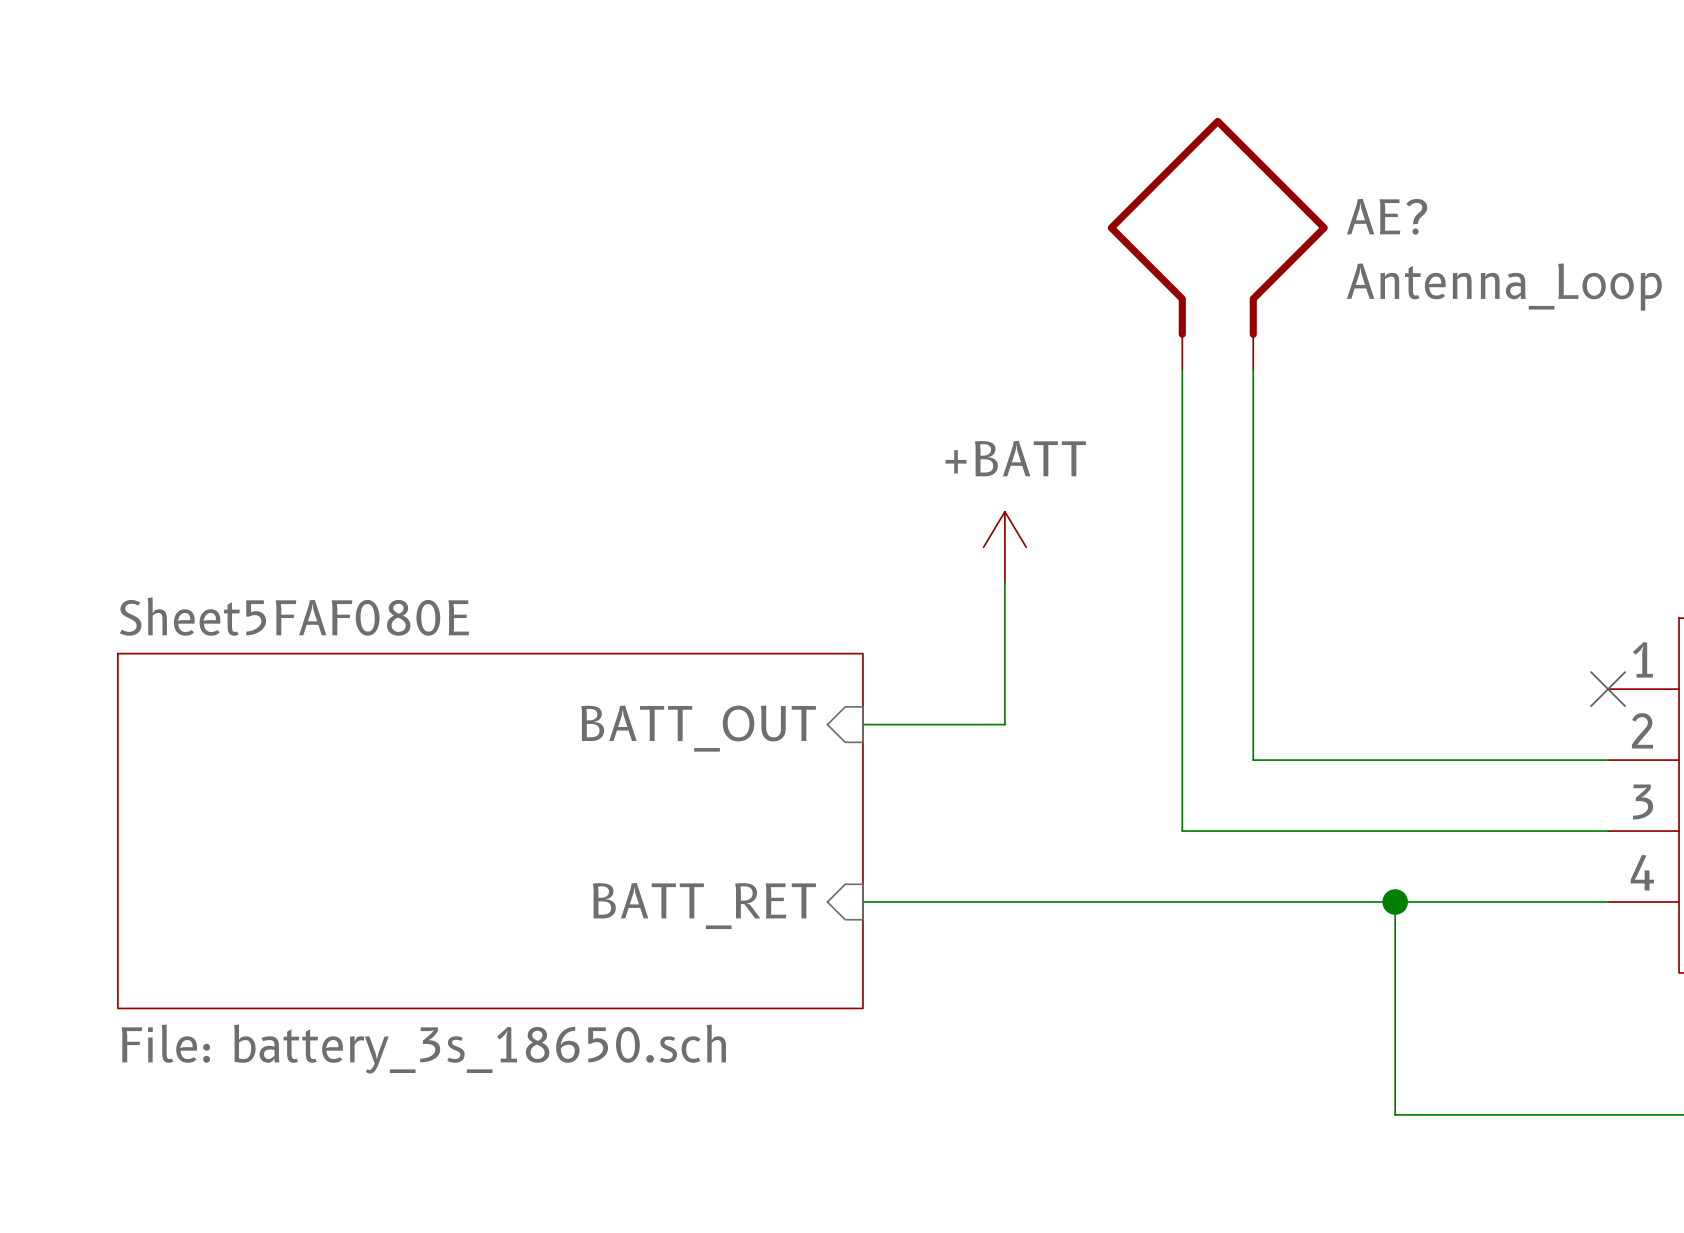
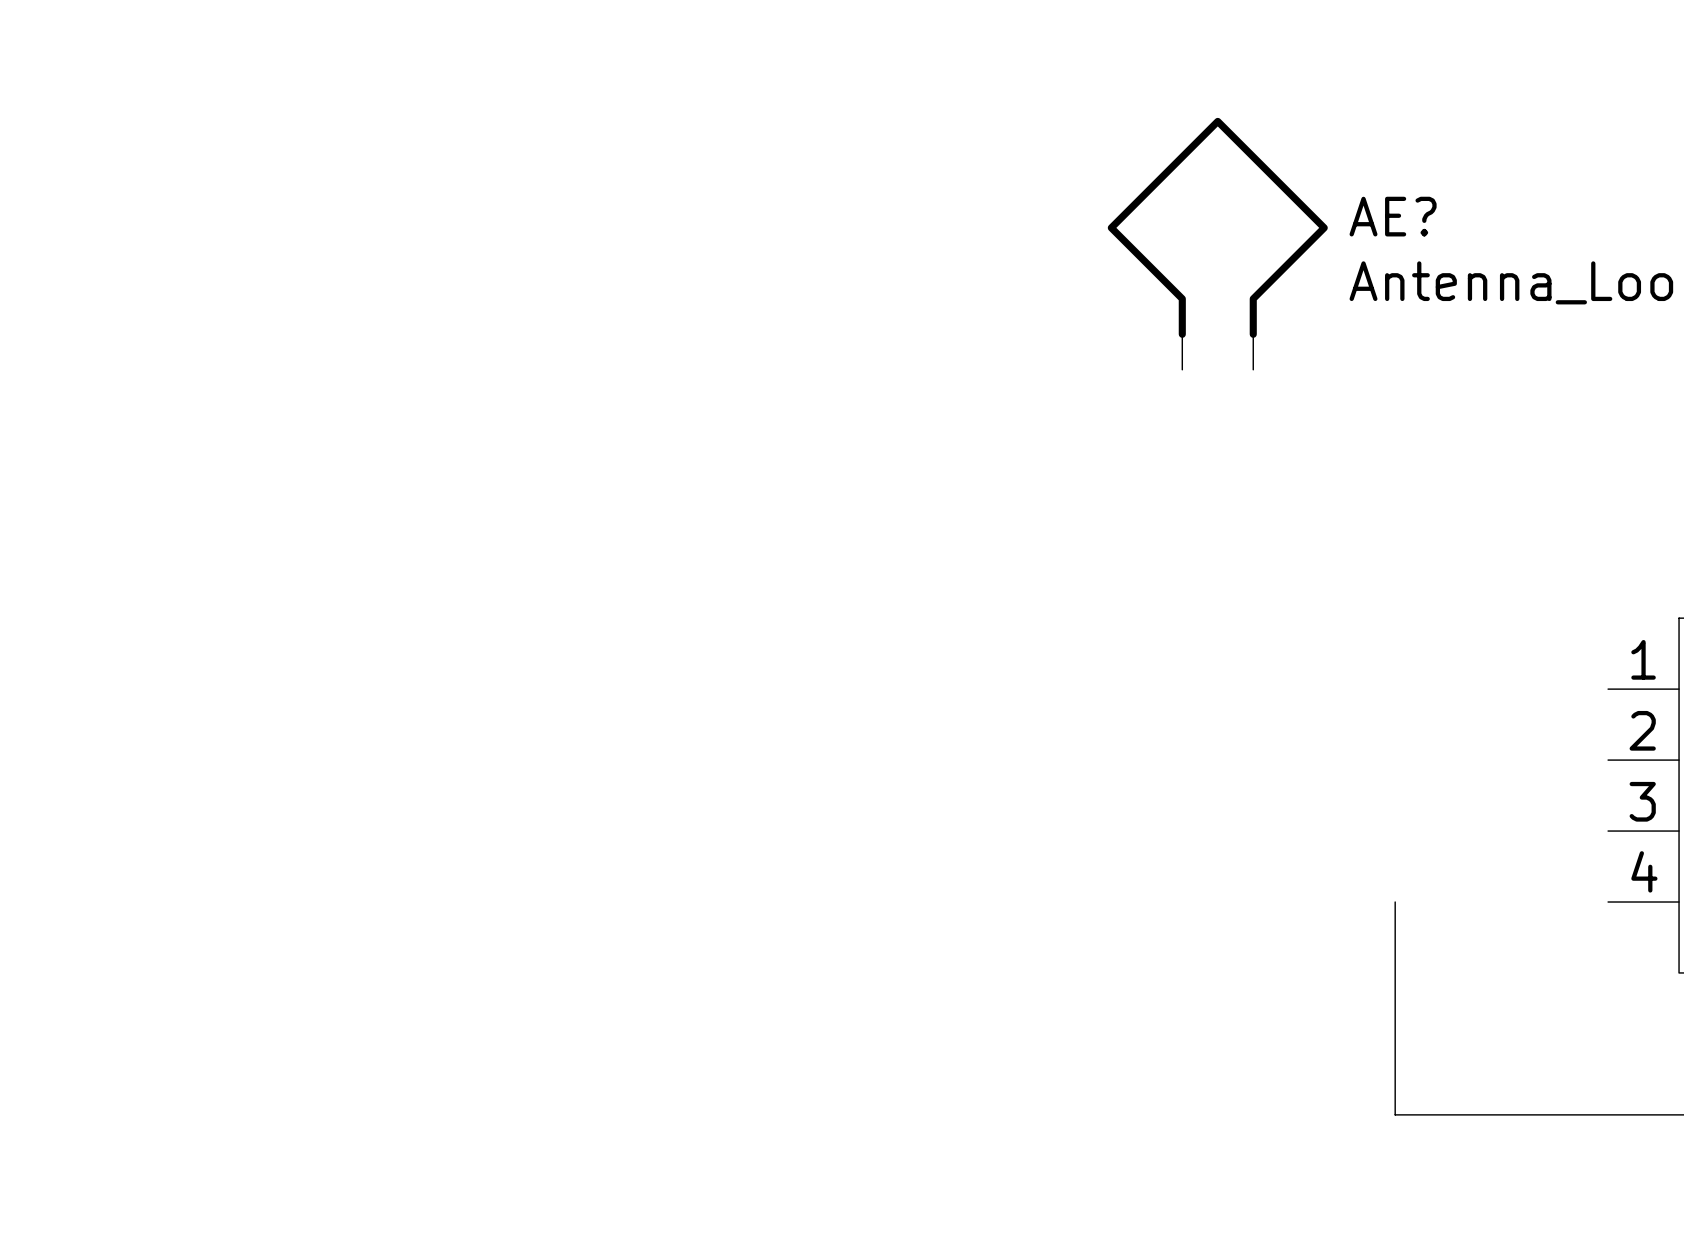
wire: (1182, 369) (1182, 831) (1608, 831) -> none
wire: (1253, 369) (1253, 760) (1608, 760) -> none
power symbol: +BATT (1004, 547) -> none
wire: (1004, 582) (1004, 724) (862, 724) -> none
no-connect mark: (1608, 689) -> none
sheet pin: BATT_OUT (698, 728) -> none
sheet Sheet5FAF080E: File: battery_3s_18650.sch (490, 831) -> none
wire: (862, 902) (1608, 902) -> none
junction: (1395, 902) -> none
sheet pin: BATT_RET (704, 905) -> none

